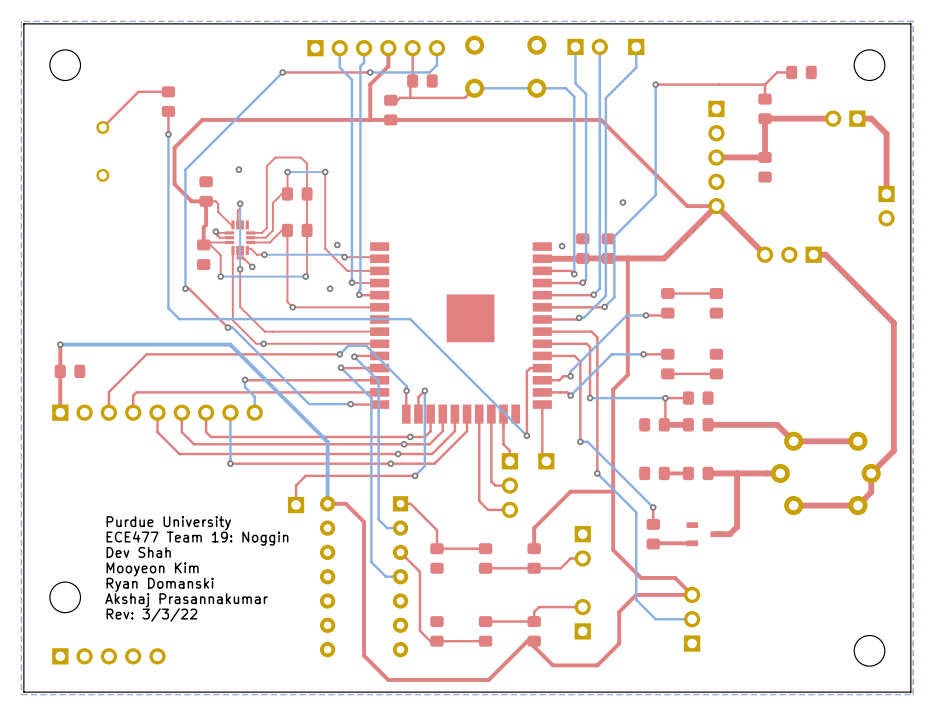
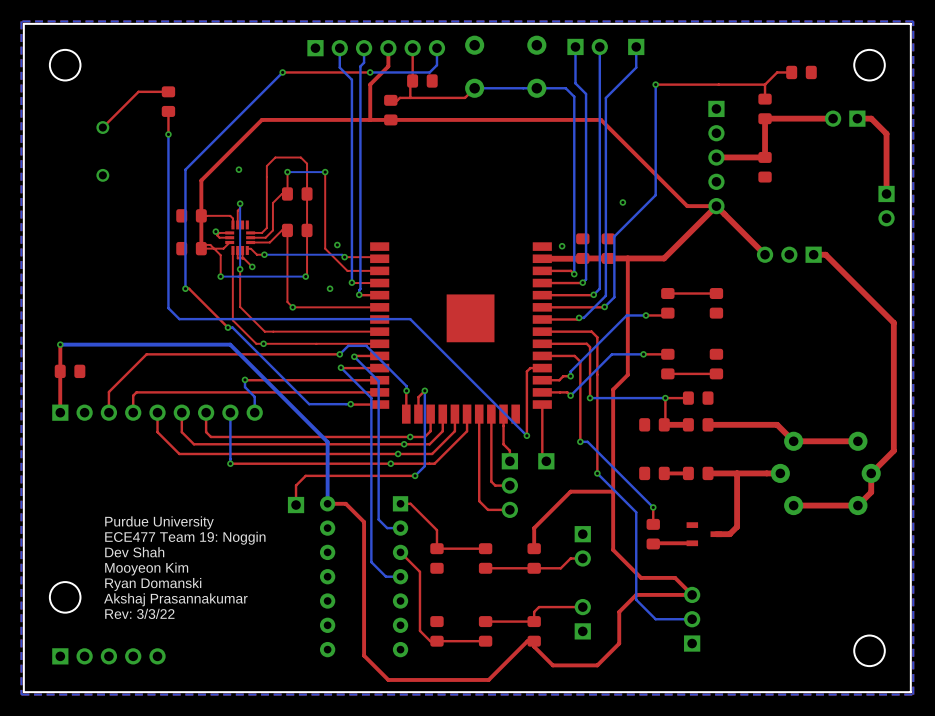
top track: (261, 119) (202, 119) (174, 147) (174, 184) (191, 201) (206, 201) -> (261, 119) (201, 180) (201, 248) (223, 248) (229, 242)
part: (206, 191) -> none
top track: (206, 201) (215, 201) (218, 203) (218, 211) (232, 226) -> none
top track: (206, 201) (203, 242) (231, 242) -> none
part: none -> (191, 215)
top track: none -> (201, 215) (230, 215) (232, 218) (232, 224)
part rotation: 0° (203, 254) -> 90° clockwise (191, 248)

